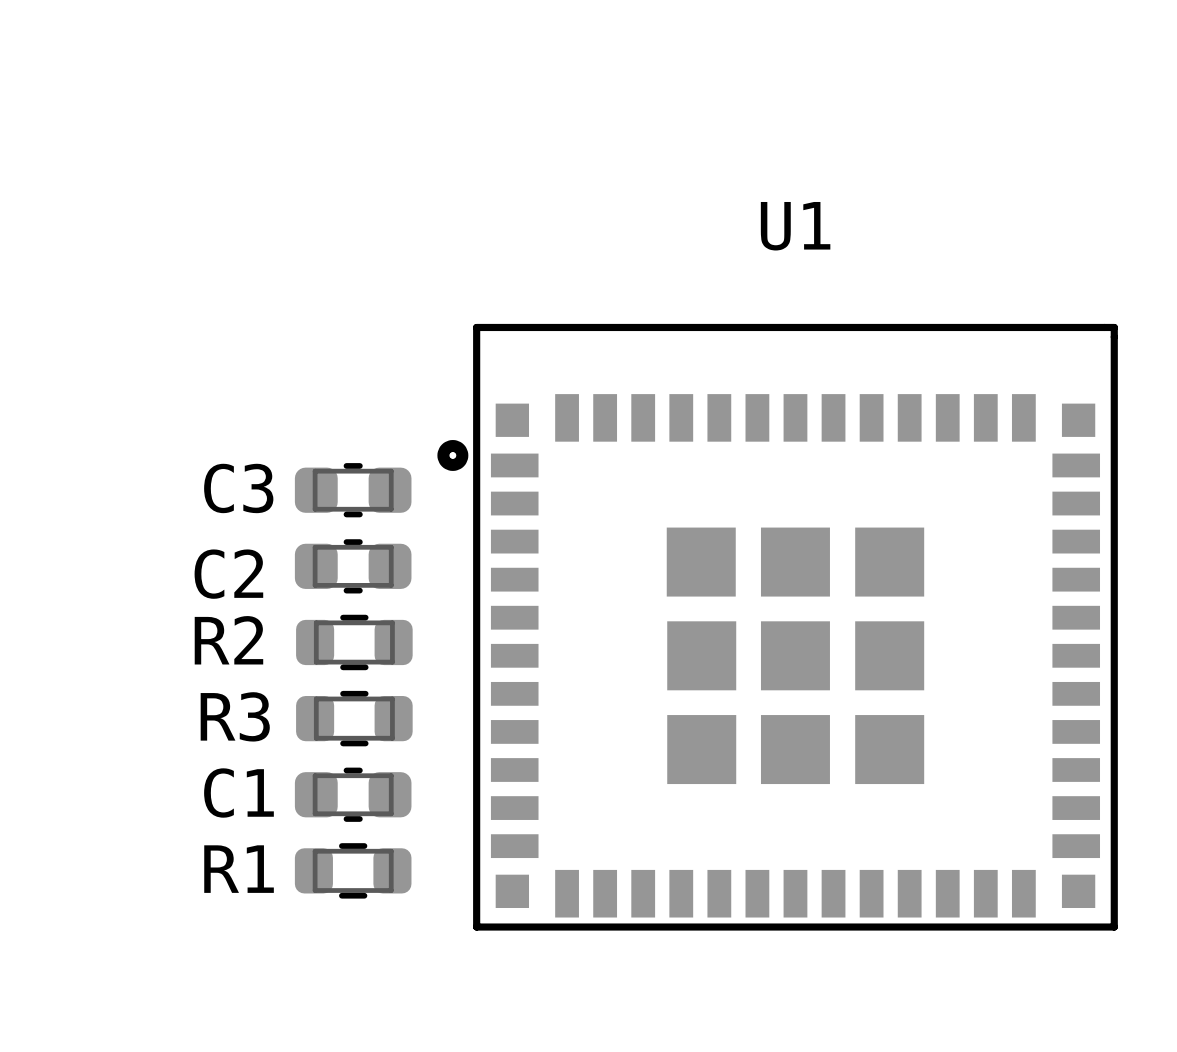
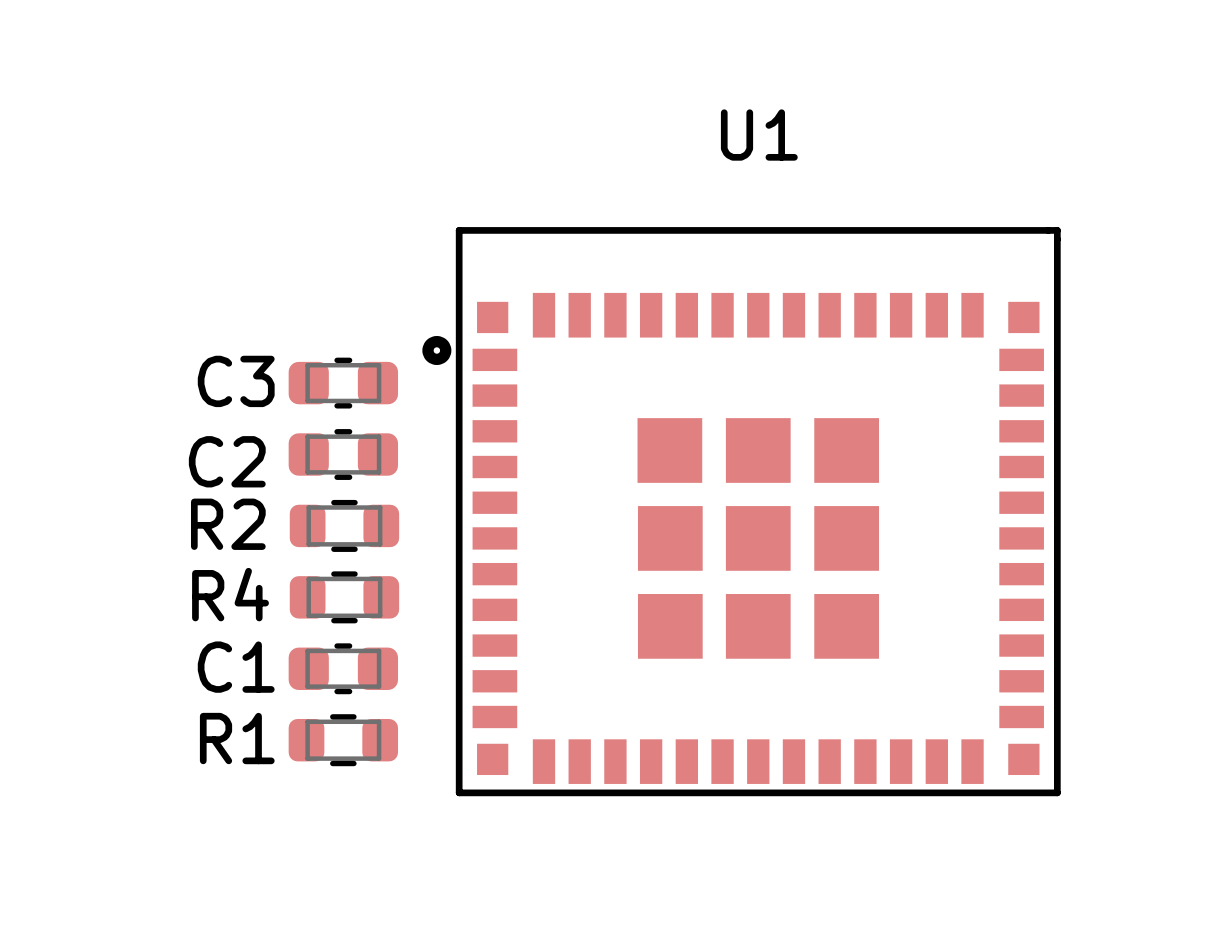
R3 name: R3 (235, 716) -> R4 (230, 594)

